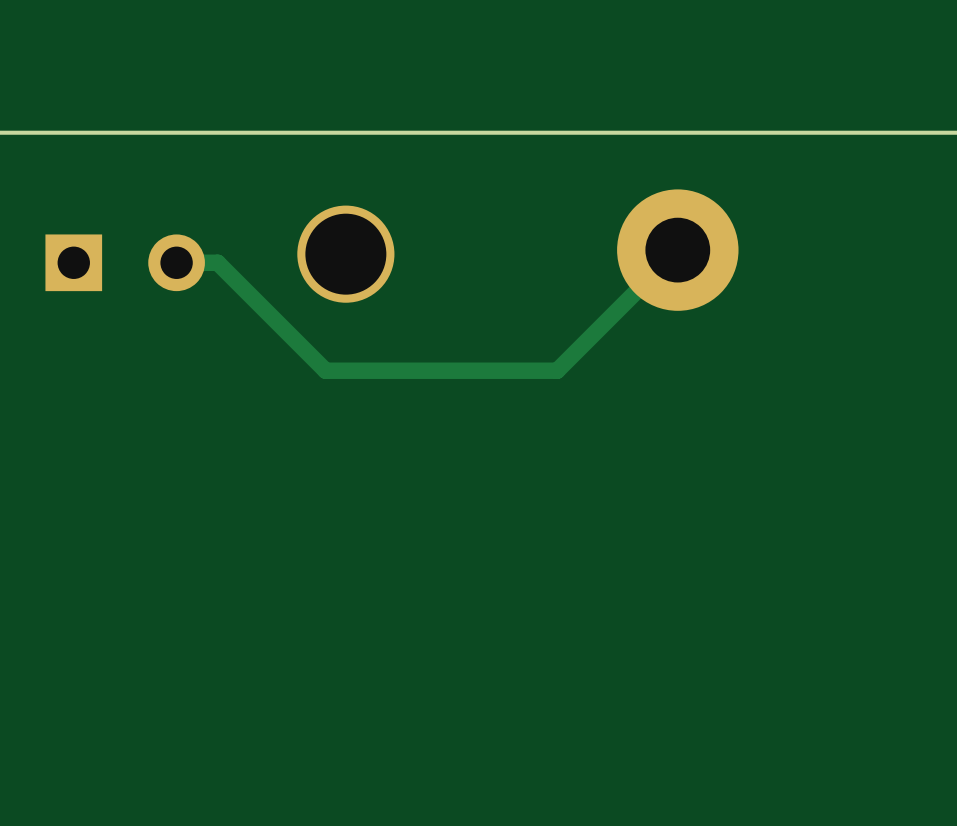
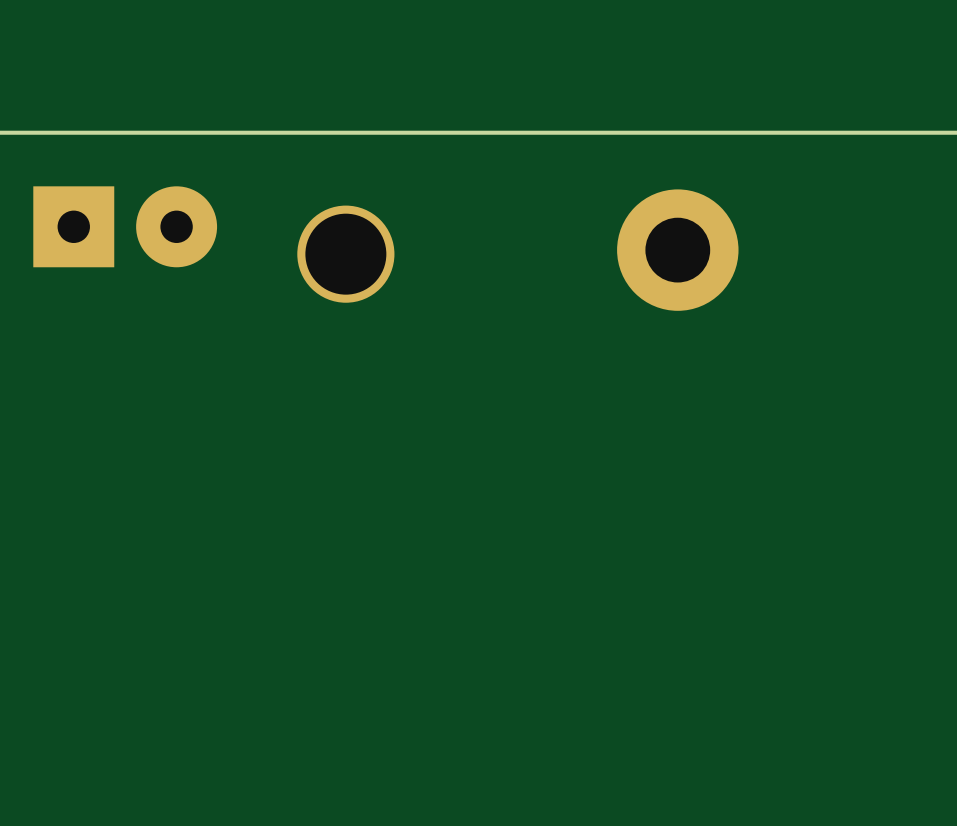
part footprint: [45, 234, 205, 292] -> [33, 186, 218, 268]
track: (677, 250) (557, 370) (325, 370) (217, 262) (176, 262) -> none

